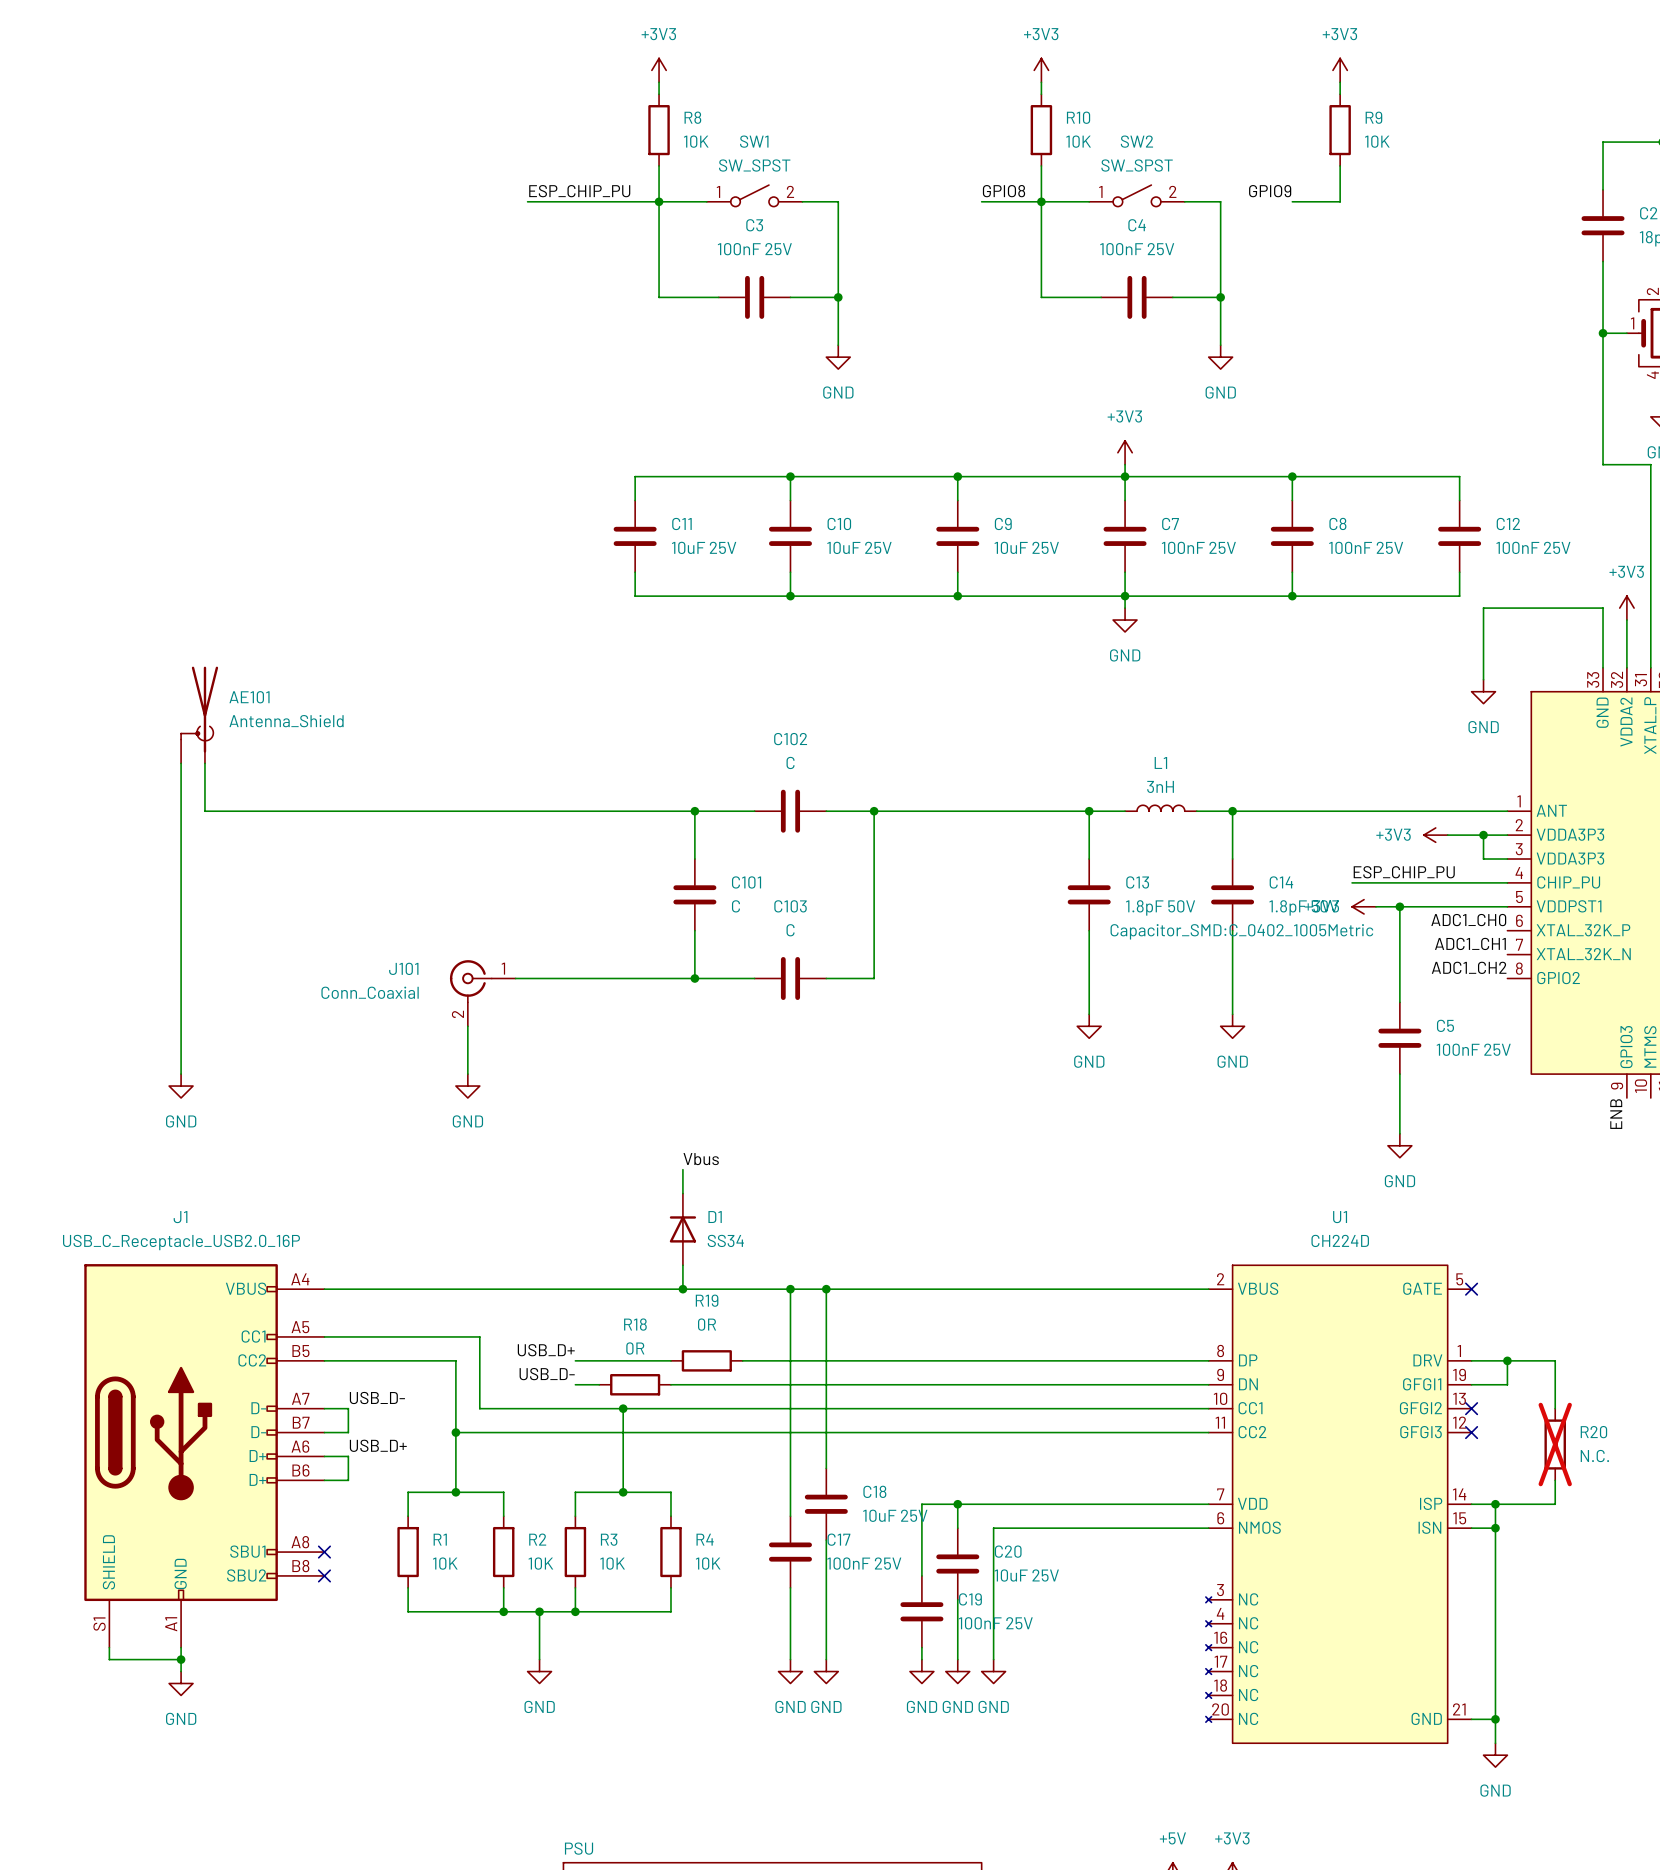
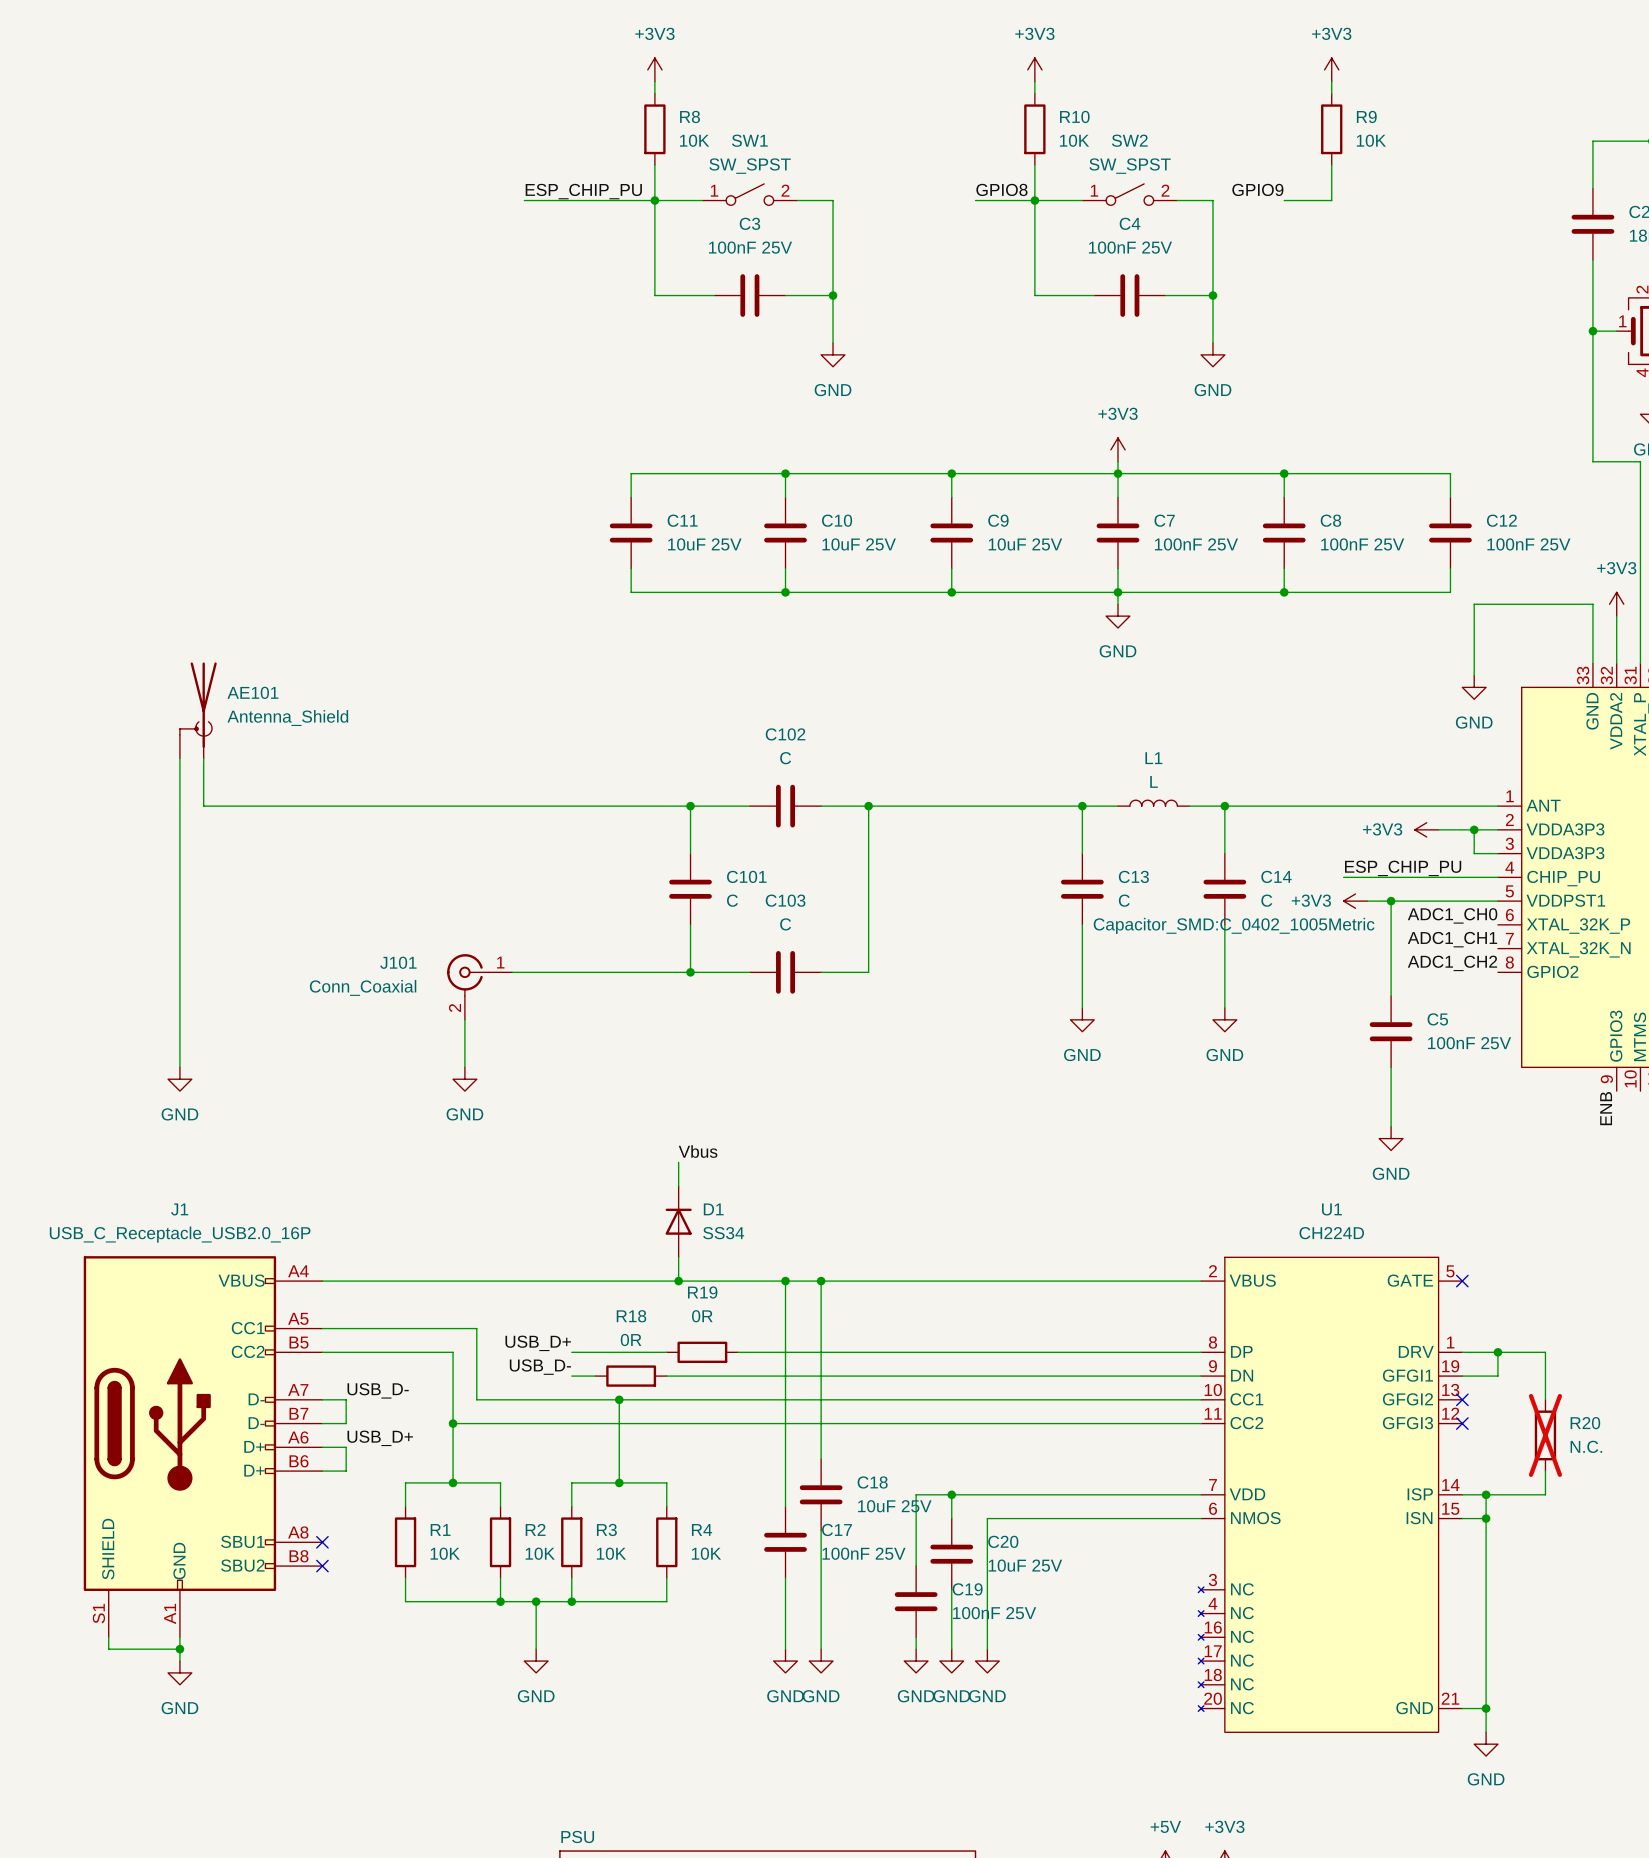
L1 value: 3nH (1160, 786) -> L (1154, 781)
C13 value: 1.8pF 50V (1160, 907) -> C (1124, 900)
C14 value: 1.8pF 50V (1303, 907) -> C (1266, 900)

